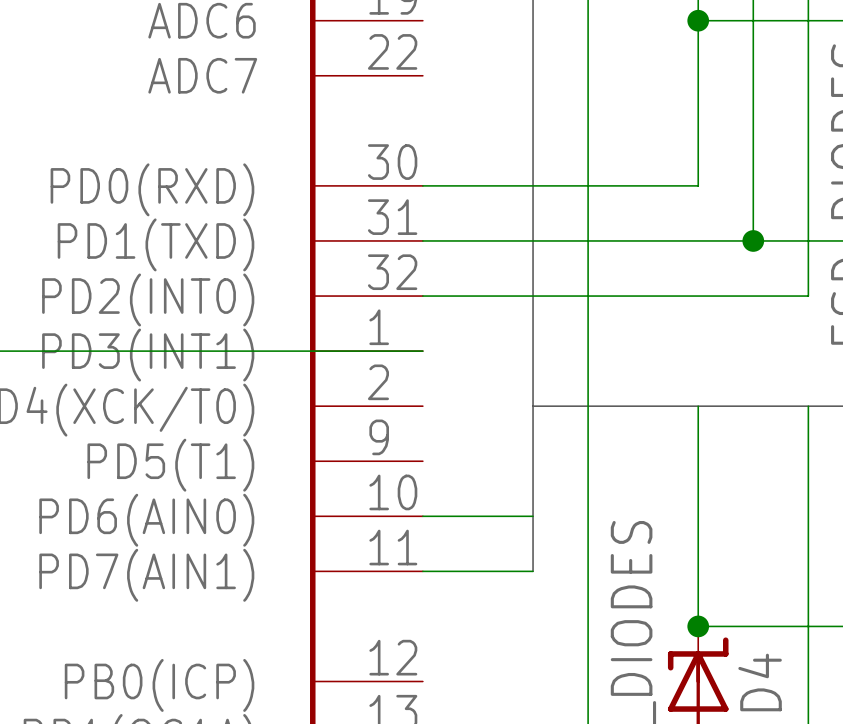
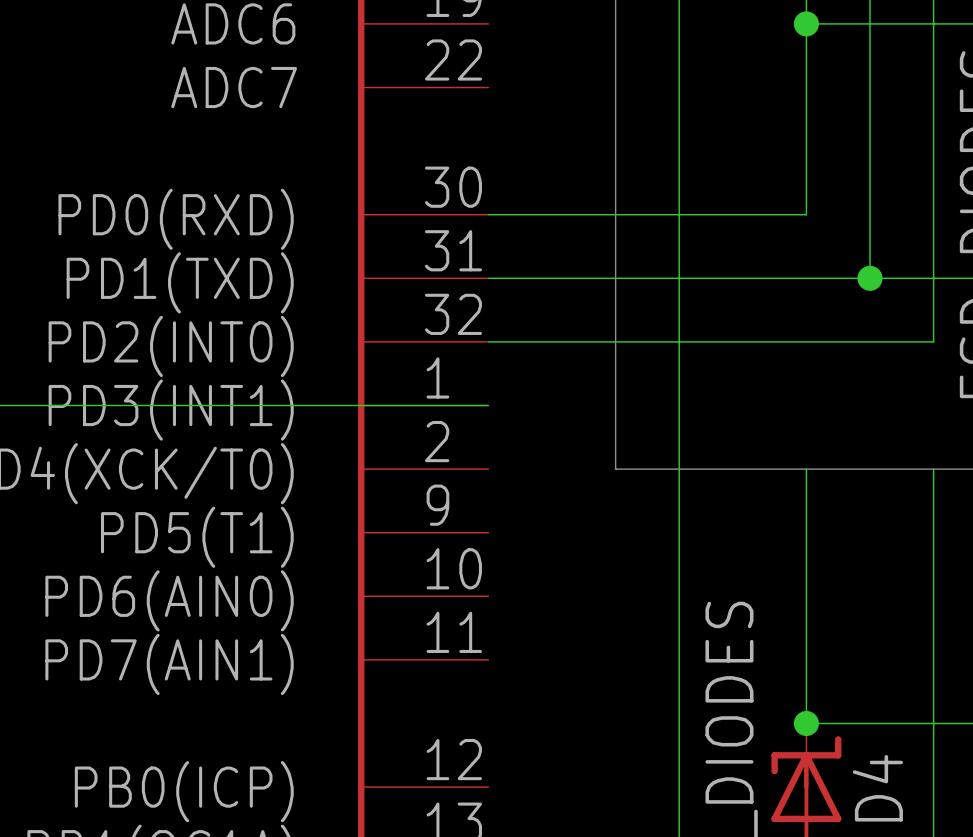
bus: (533, 406) (533, 571) -> none
wire: (422, 516) (533, 516) -> none
wire: (422, 571) (533, 571) -> none

